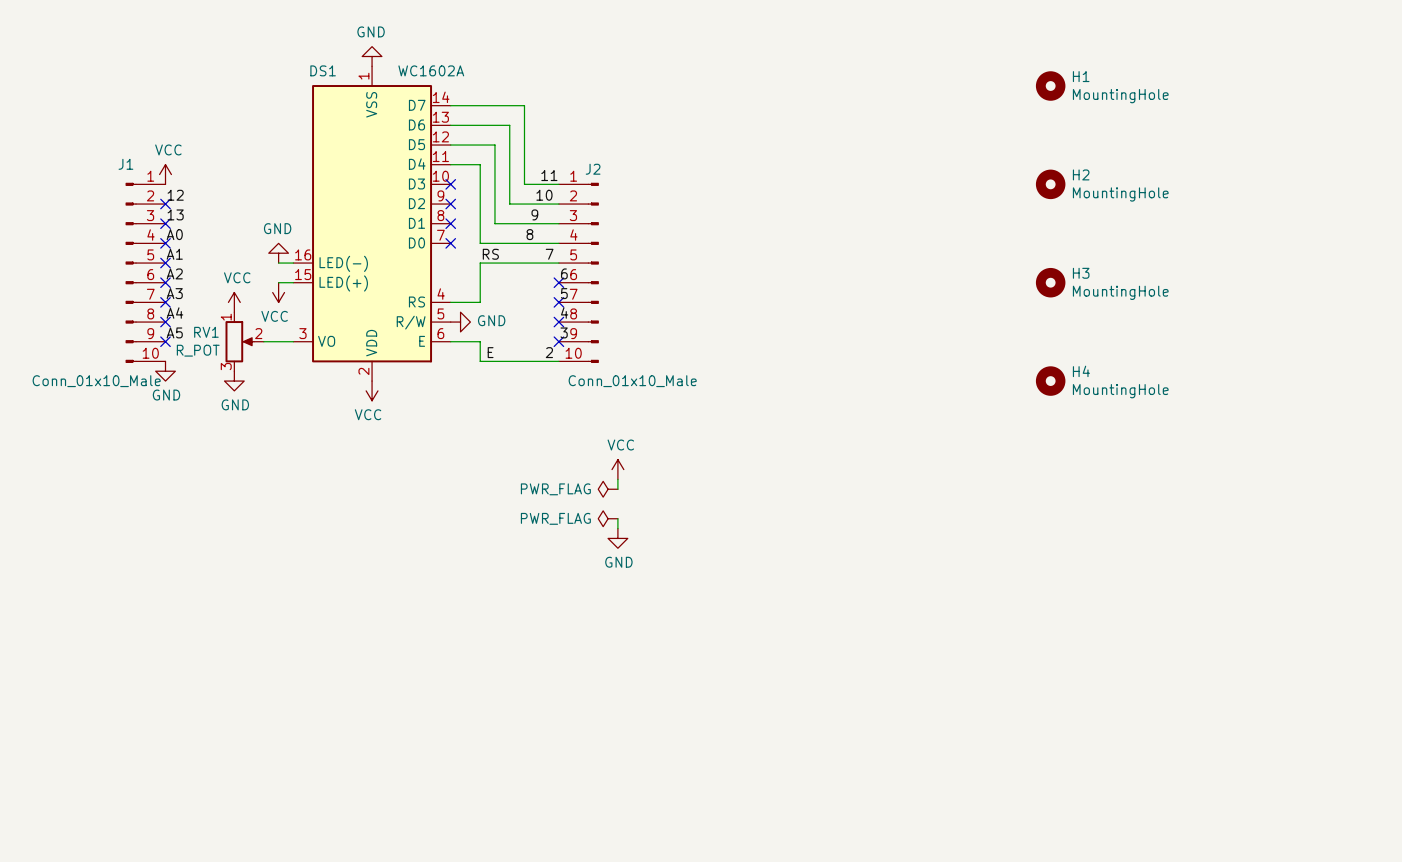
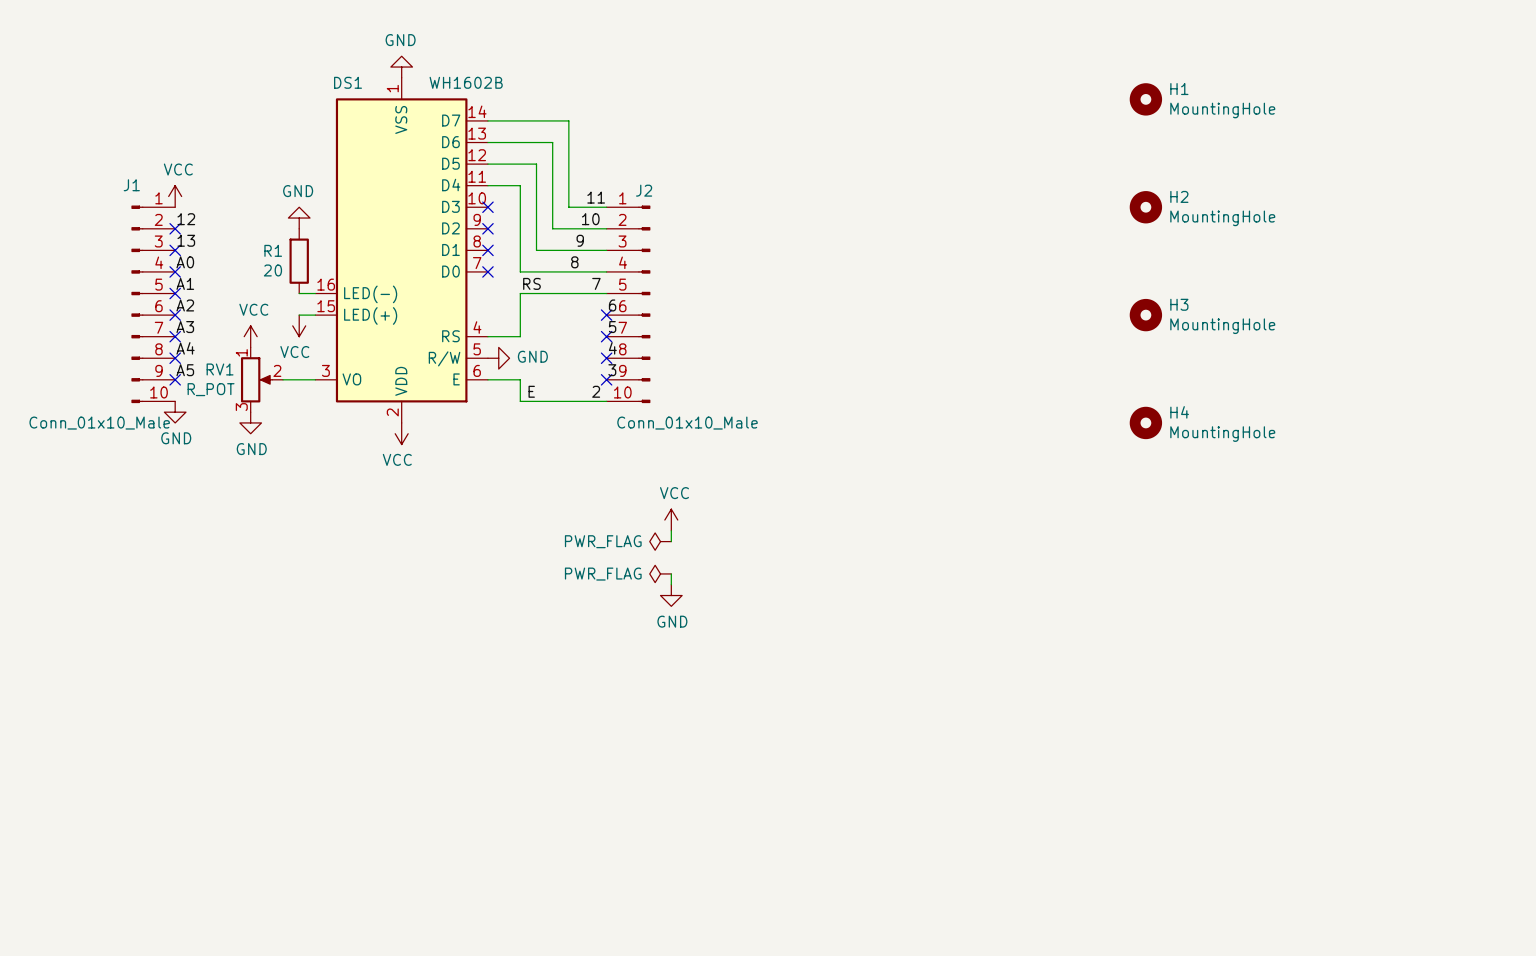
DS1 value: WC1602A (431, 70) -> WH1602B (466, 82)
R1: none -> 20 (299, 261)
power symbol position: GND (278, 253) -> GND (299, 218)

